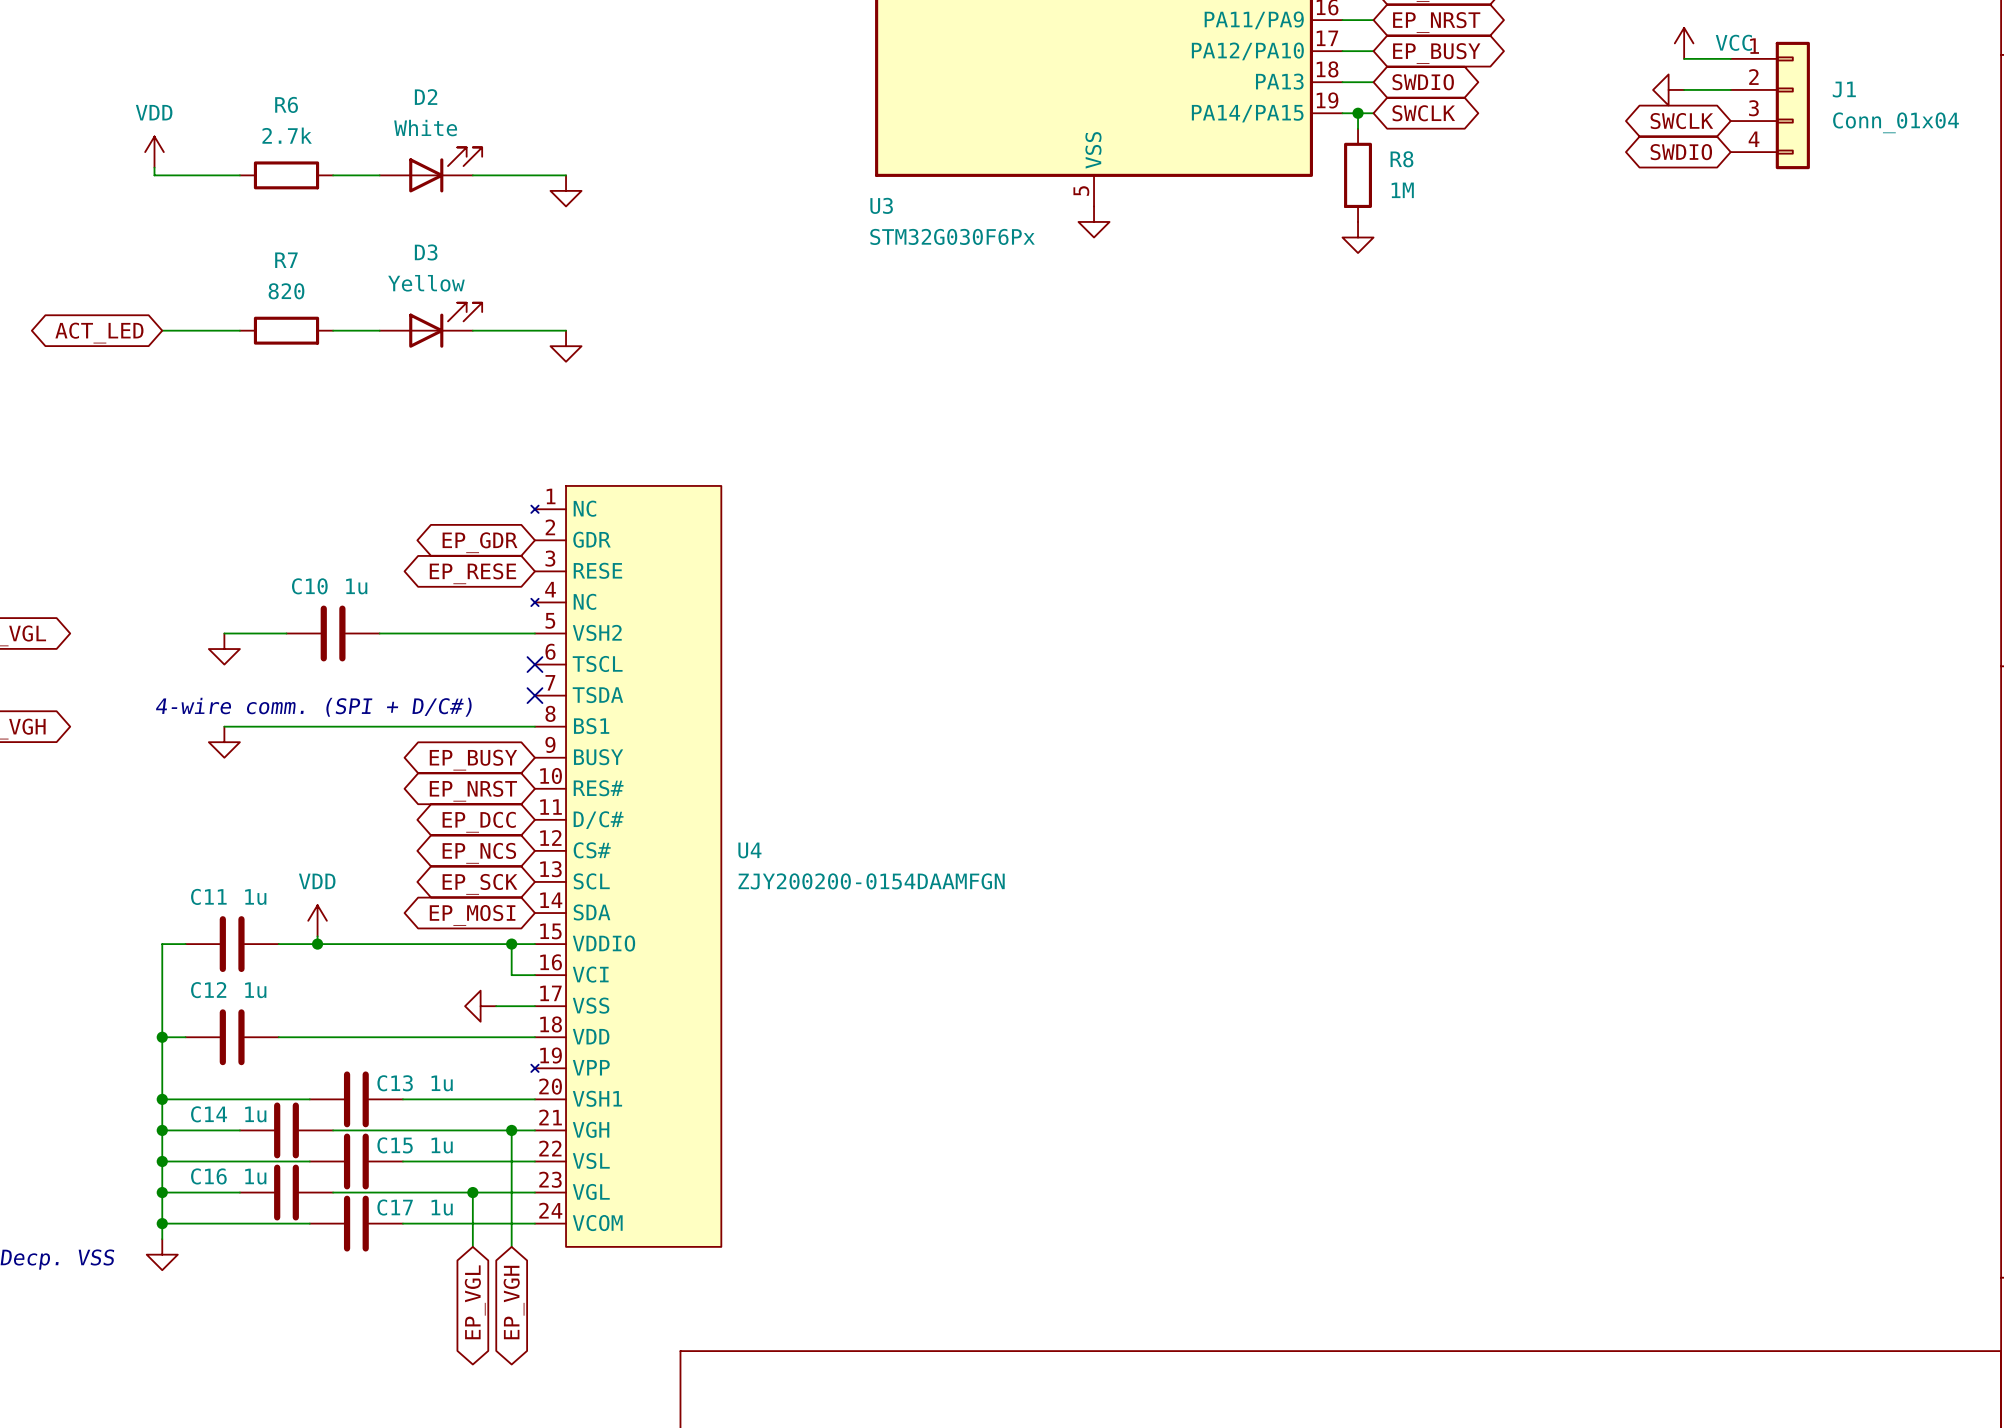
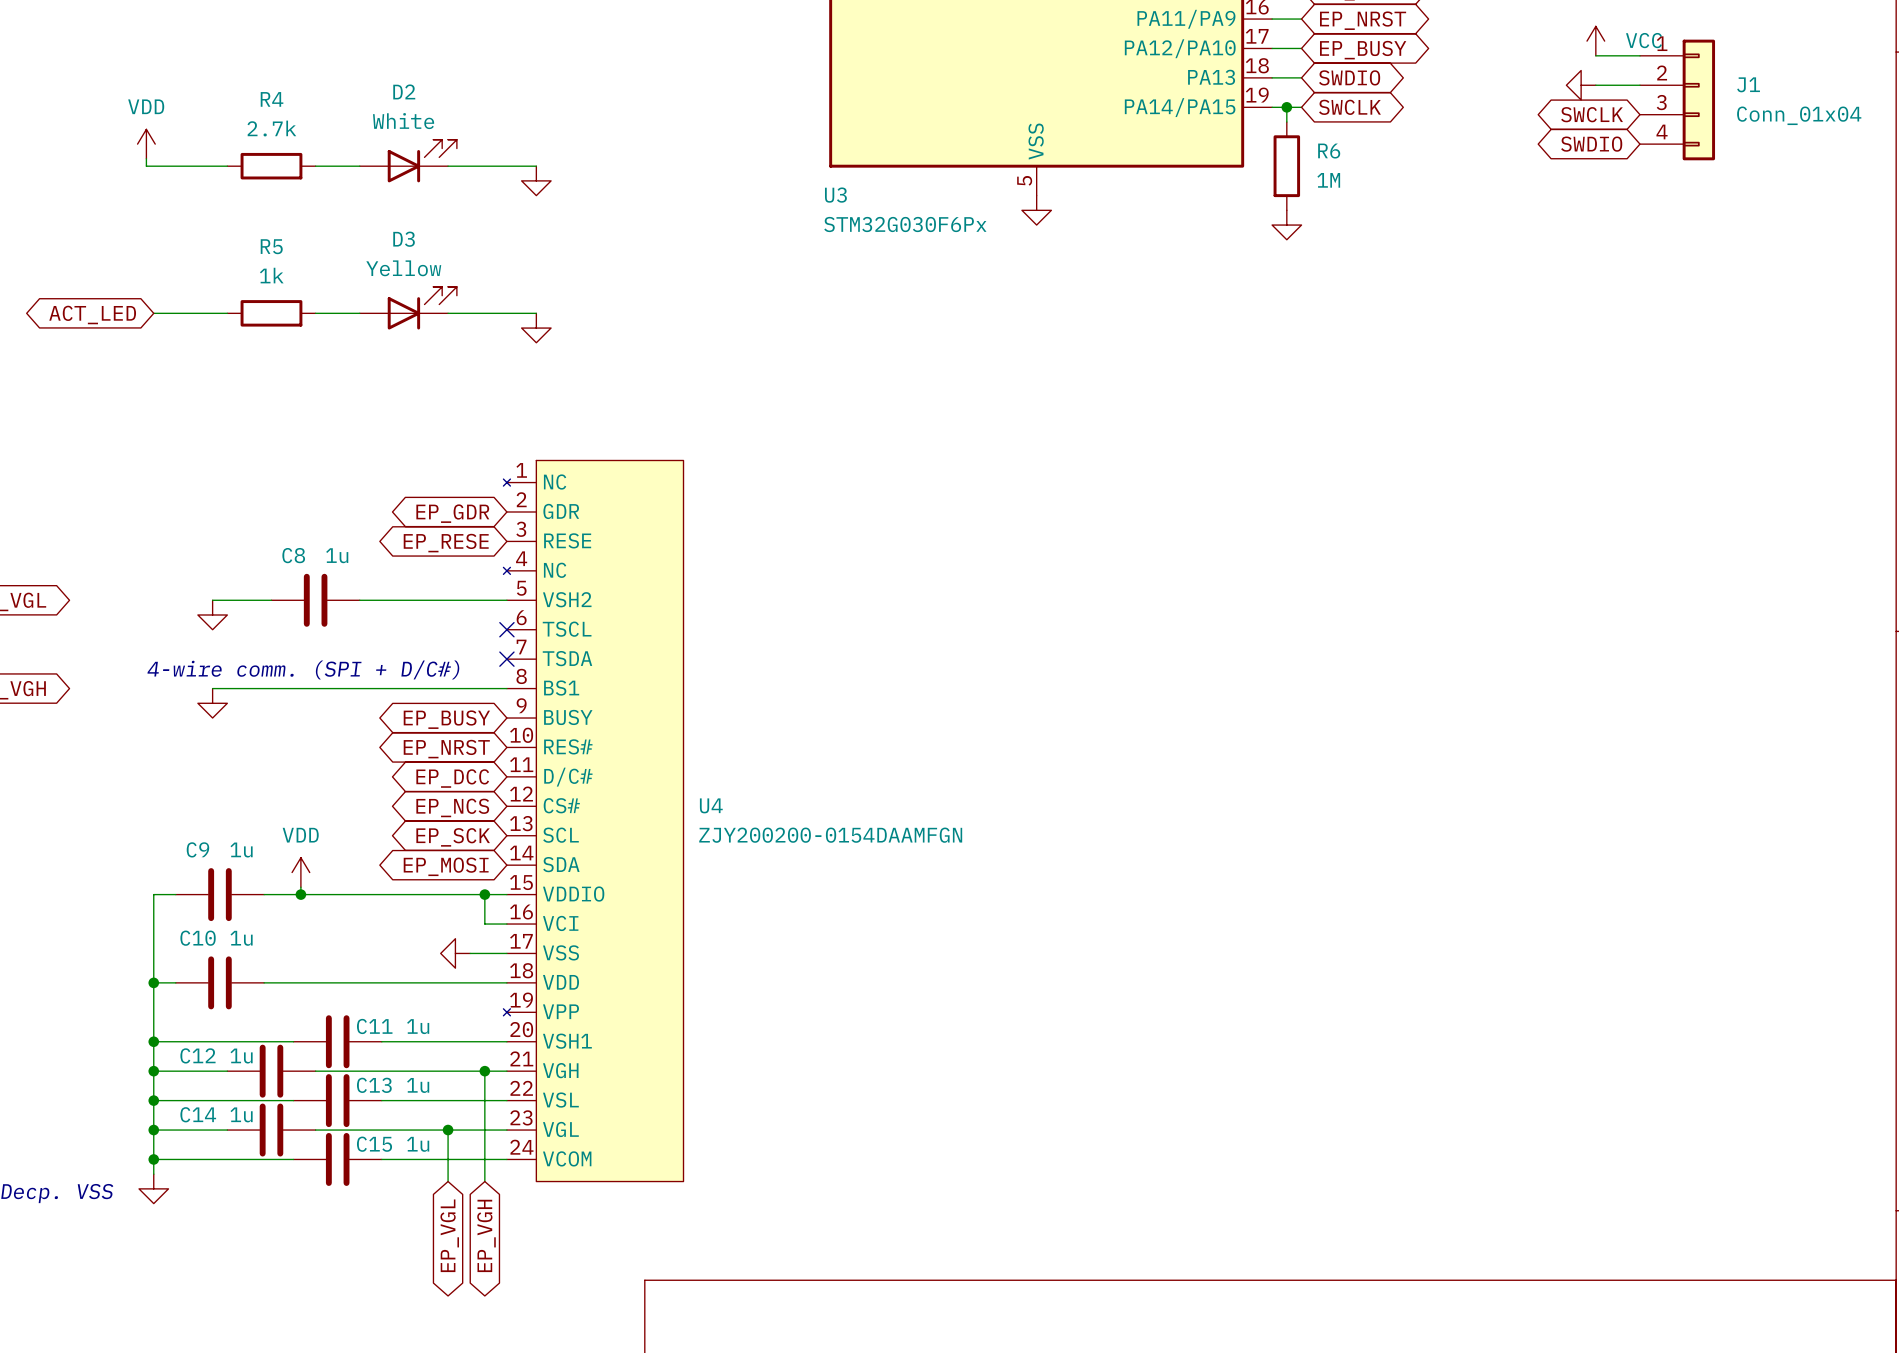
R6 name: R6 (286, 104) -> R4 (272, 99)
R8 name: R8 (1401, 159) -> R6 (1329, 151)
R7 name: R7 (286, 260) -> R5 (271, 246)
R7 value: 820 (286, 291) -> 1k (271, 275)
C10 name: C10 (309, 586) -> C8 (293, 555)
C11 name: C11 (208, 896) -> C9 (197, 849)
C12 name: C12 (208, 990) -> C10 (198, 938)
C13 name: C13 (395, 1083) -> C11 (374, 1026)
C14 name: C14 (209, 1114) -> C12 (197, 1055)
C15 name: C15 (395, 1145) -> C13 (374, 1085)
C16 name: C16 (208, 1176) -> C14 (198, 1114)
C17 name: C17 (395, 1207) -> C15 (374, 1144)

